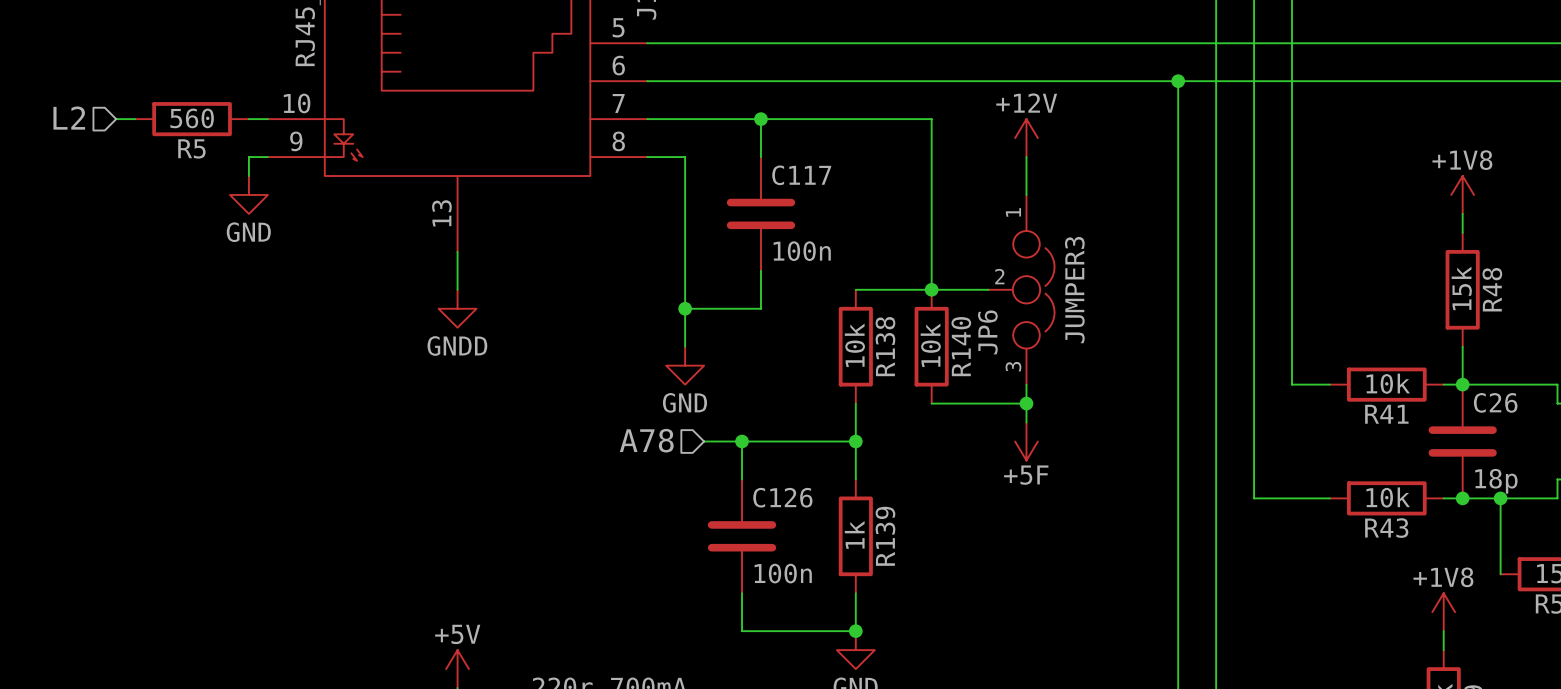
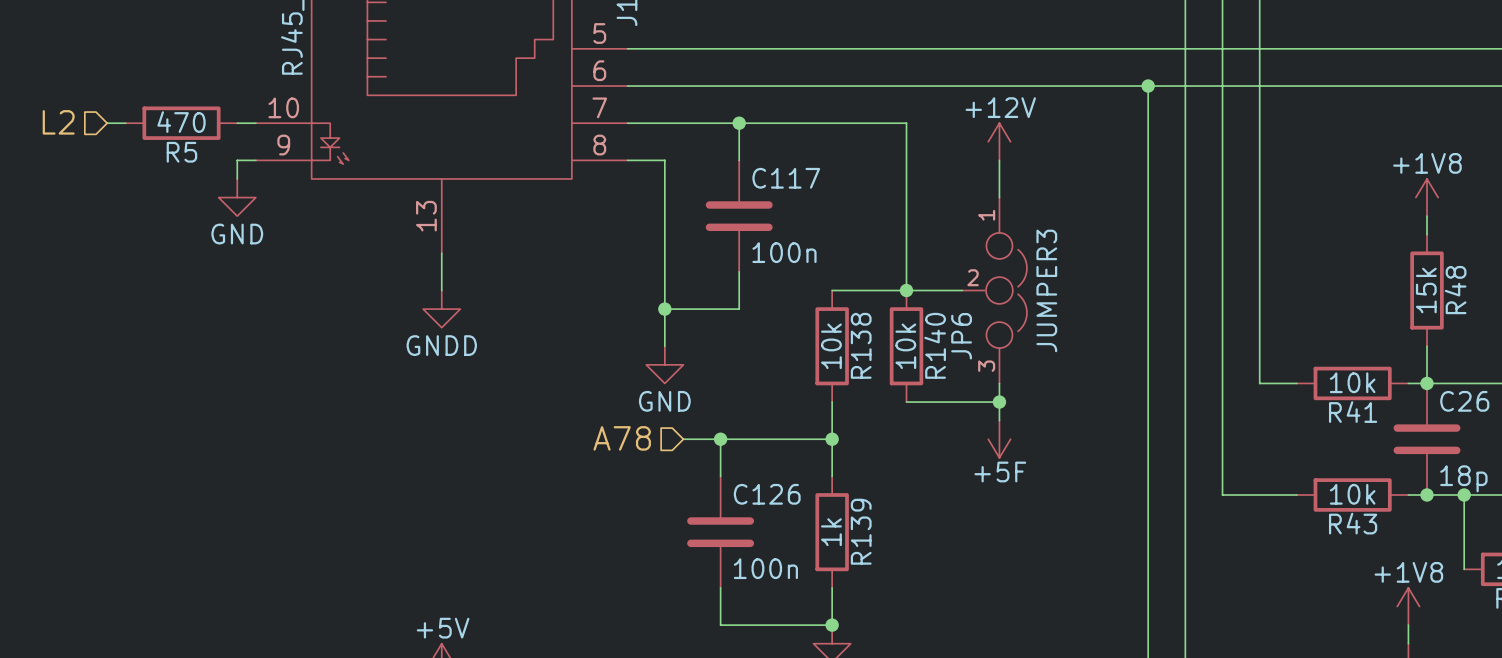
R5 value: 560 (192, 118) -> 470 (181, 122)

